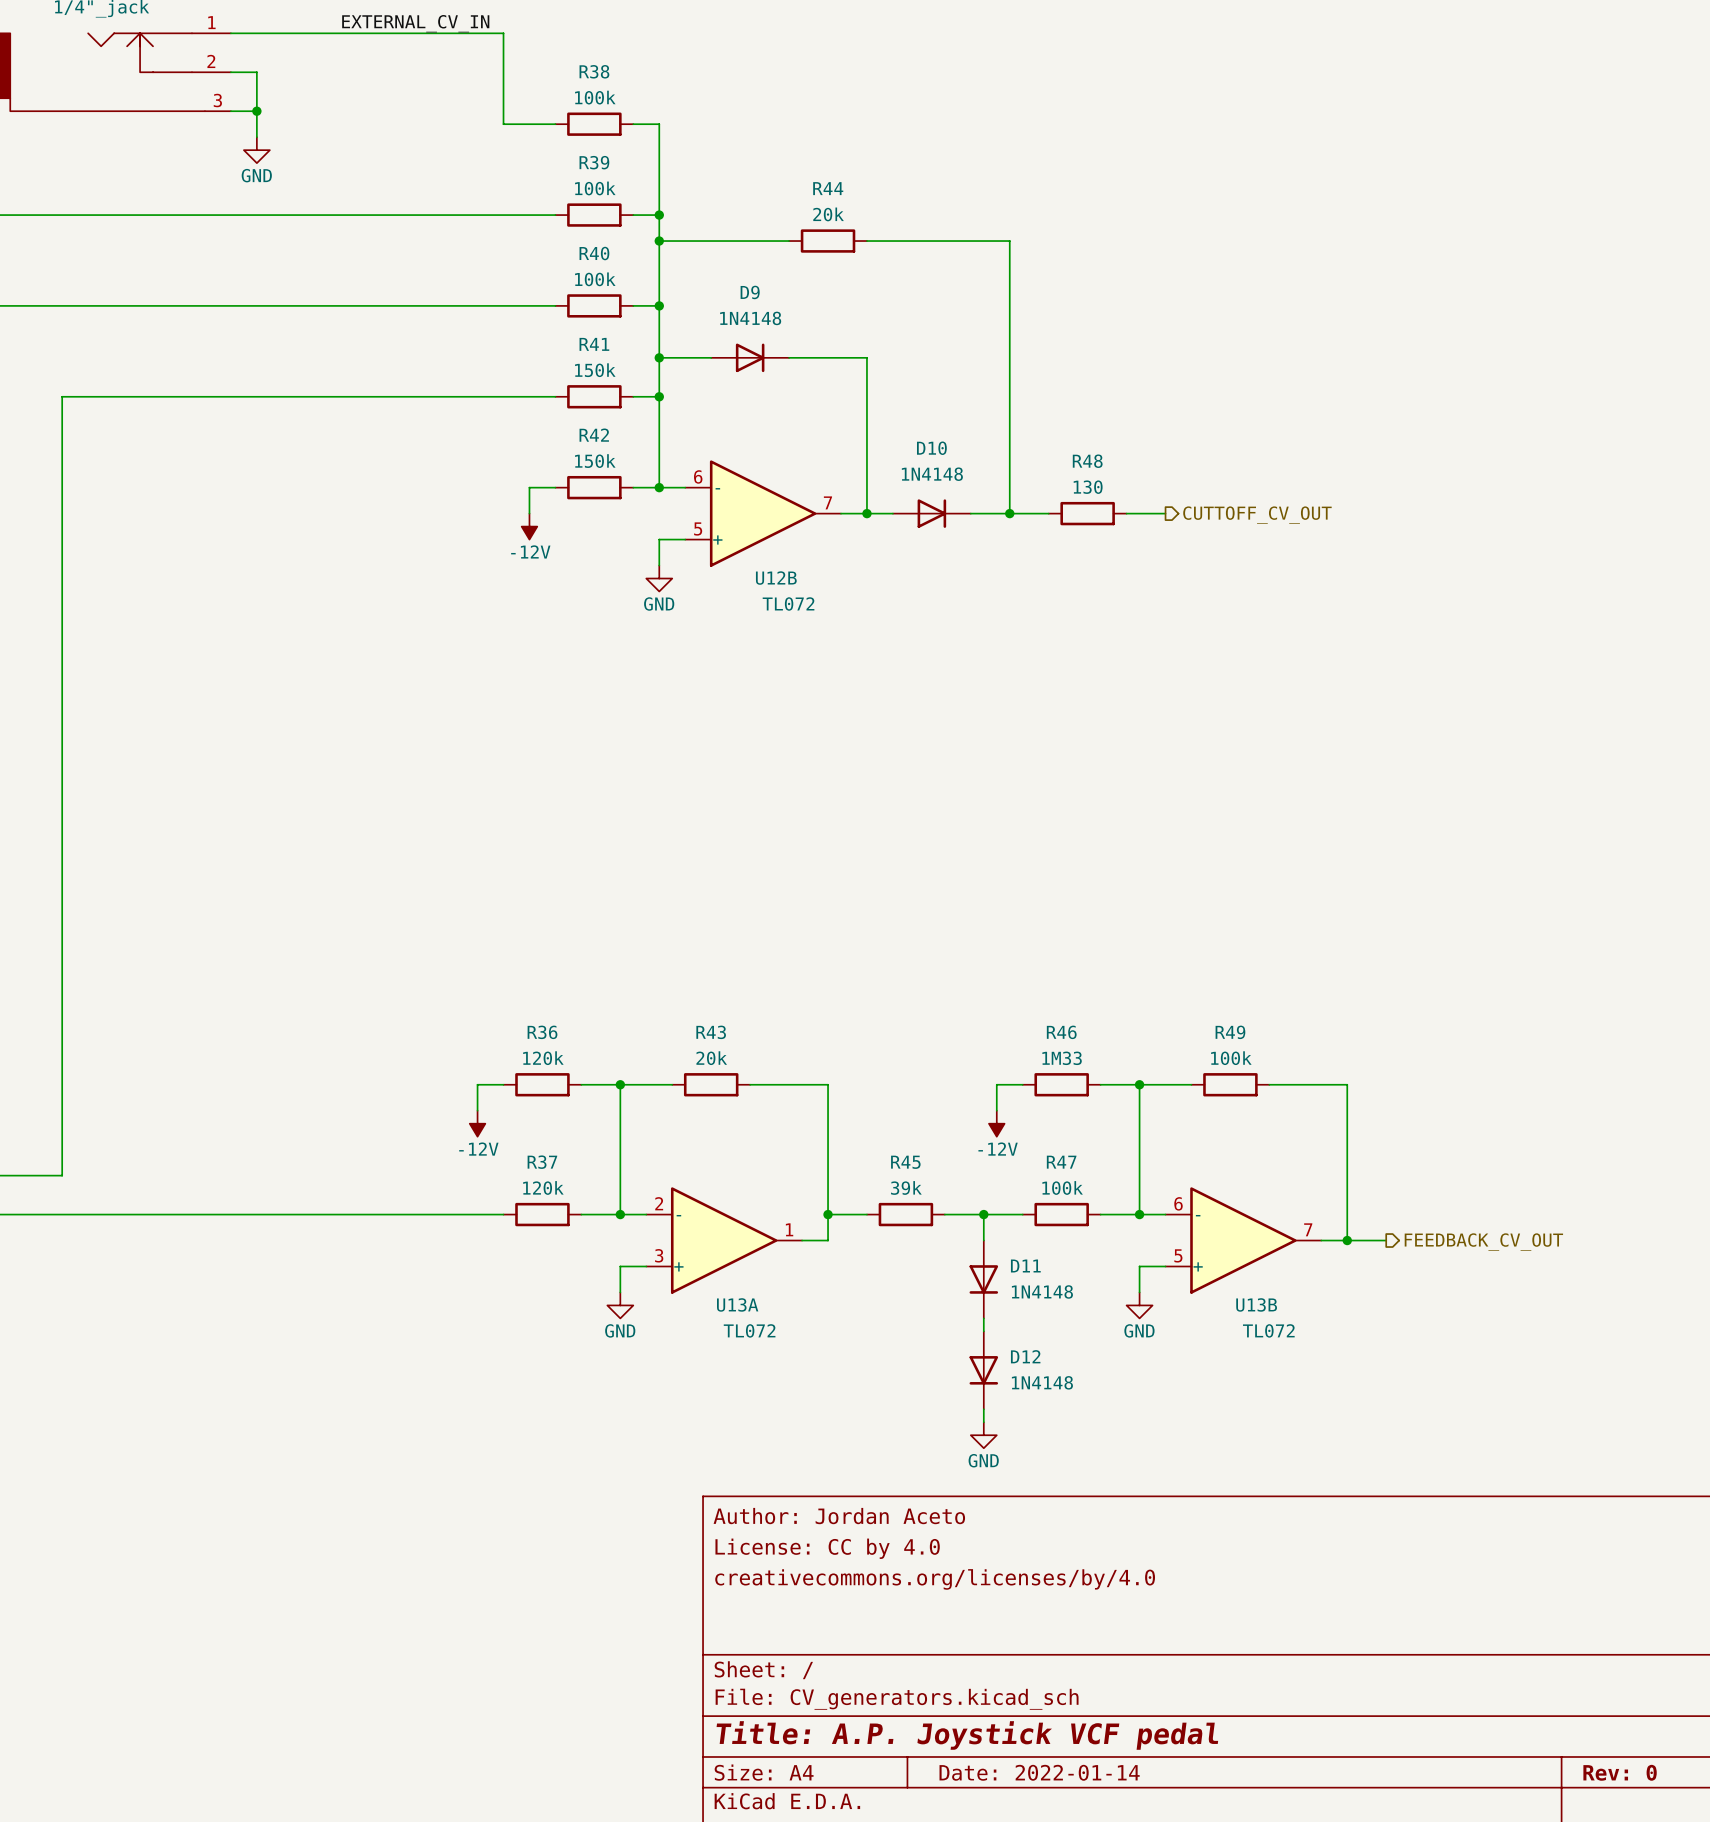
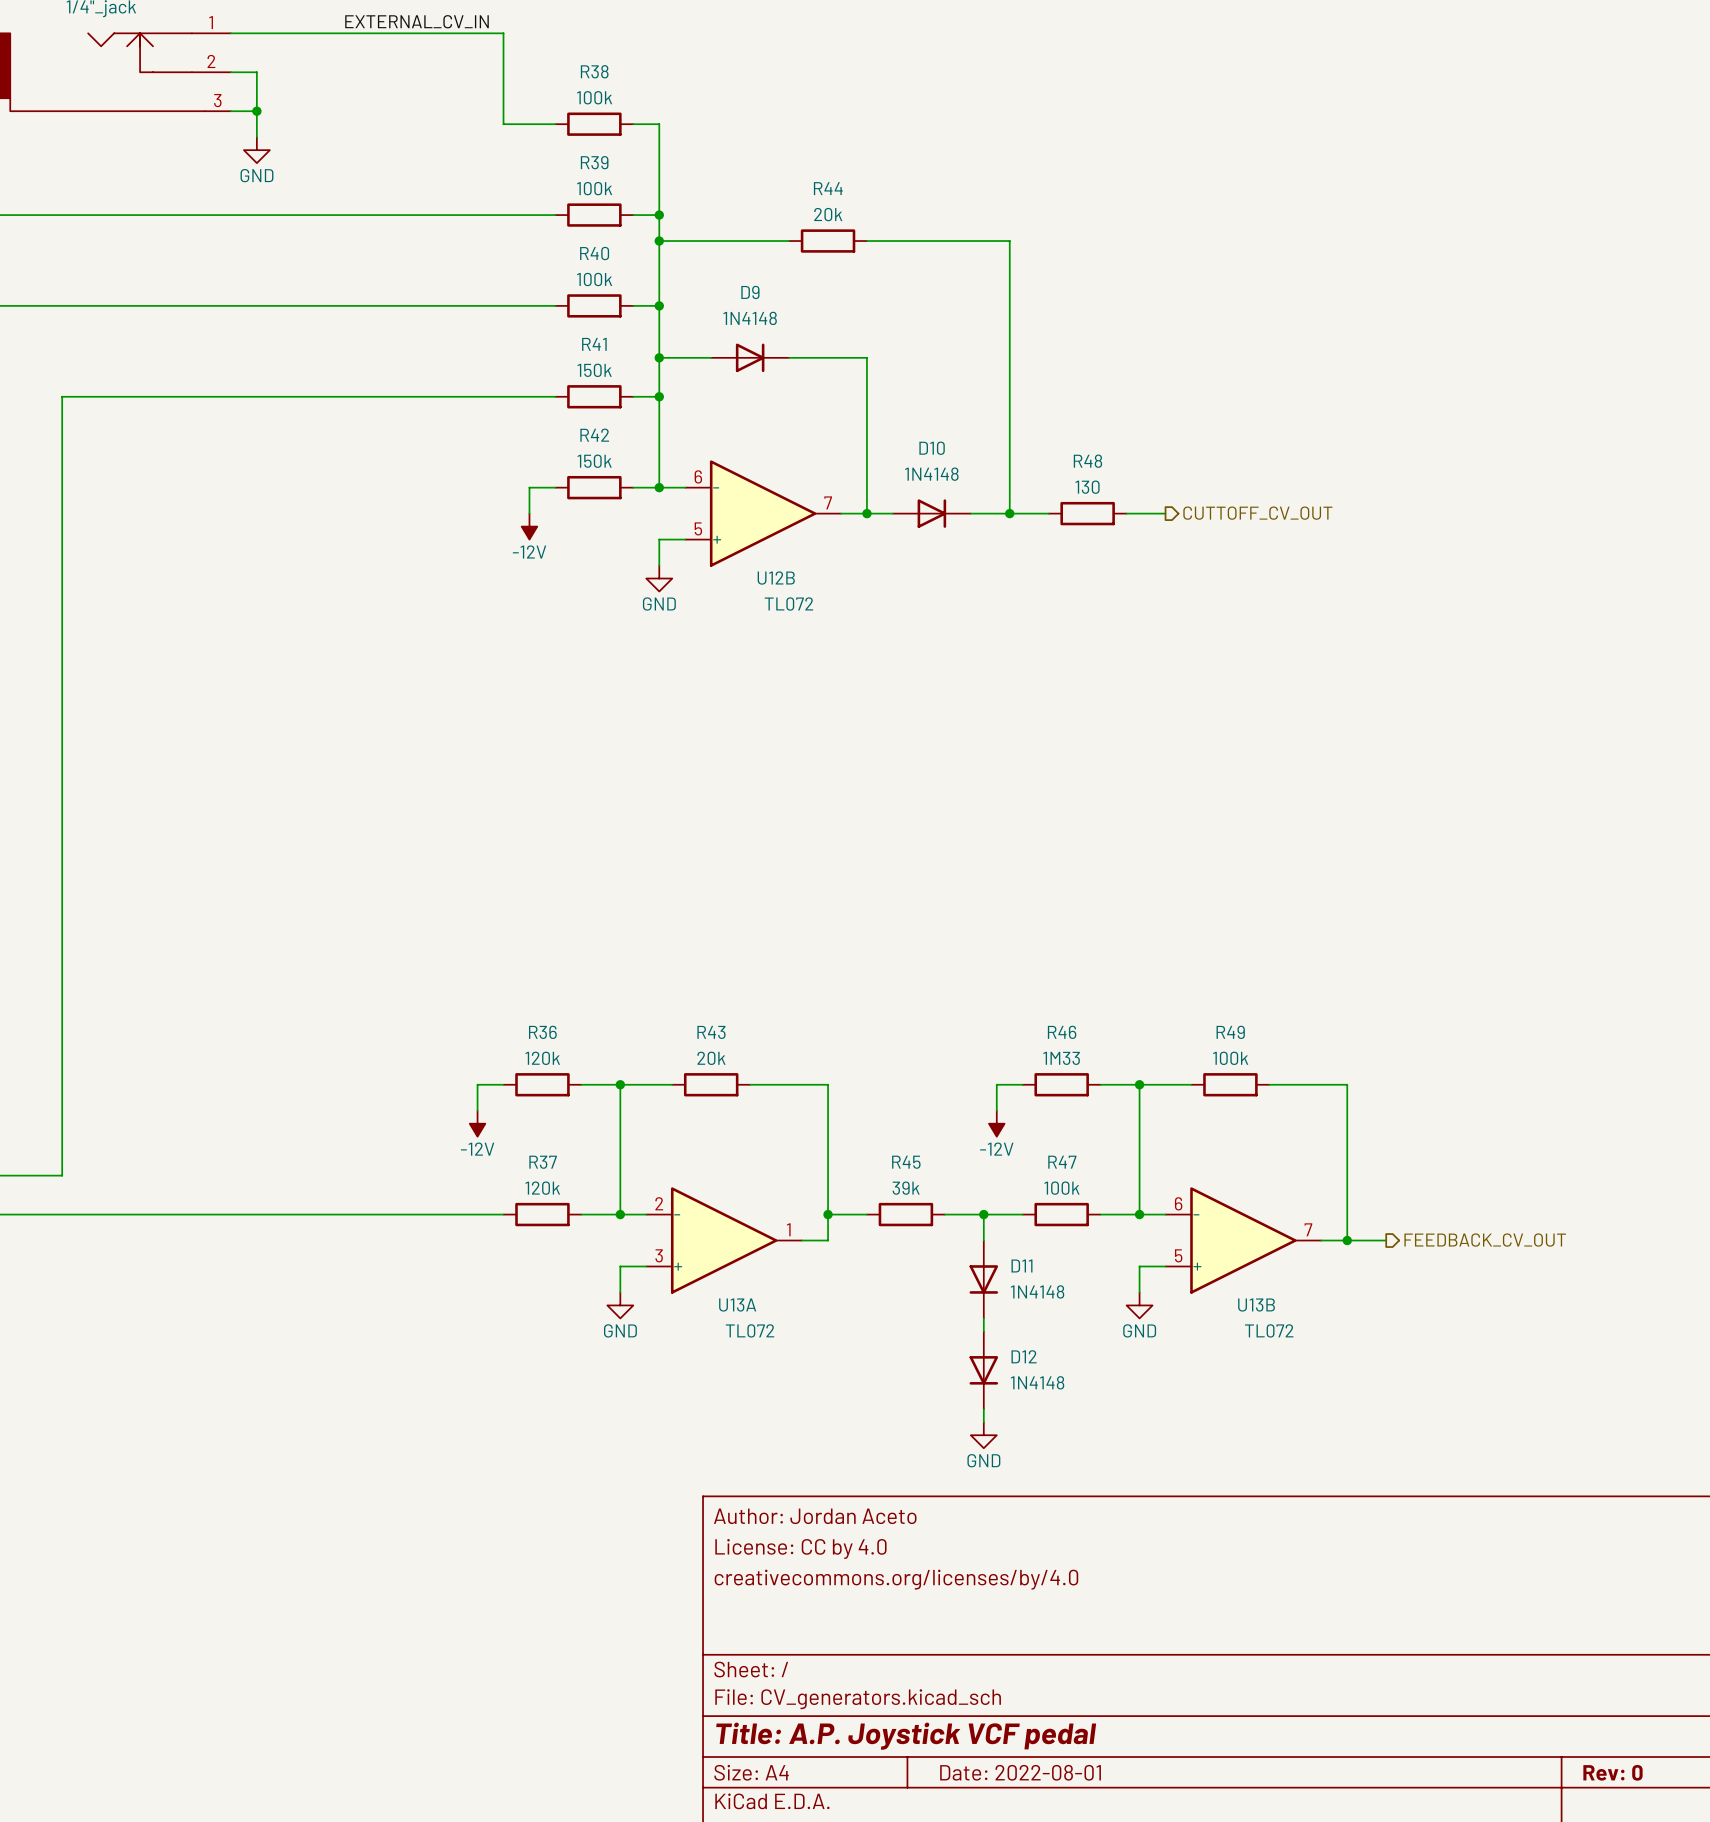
title block: Date: 2022-01-14 (1039, 1772) -> Date: 2022-08-01 (1020, 1772)

